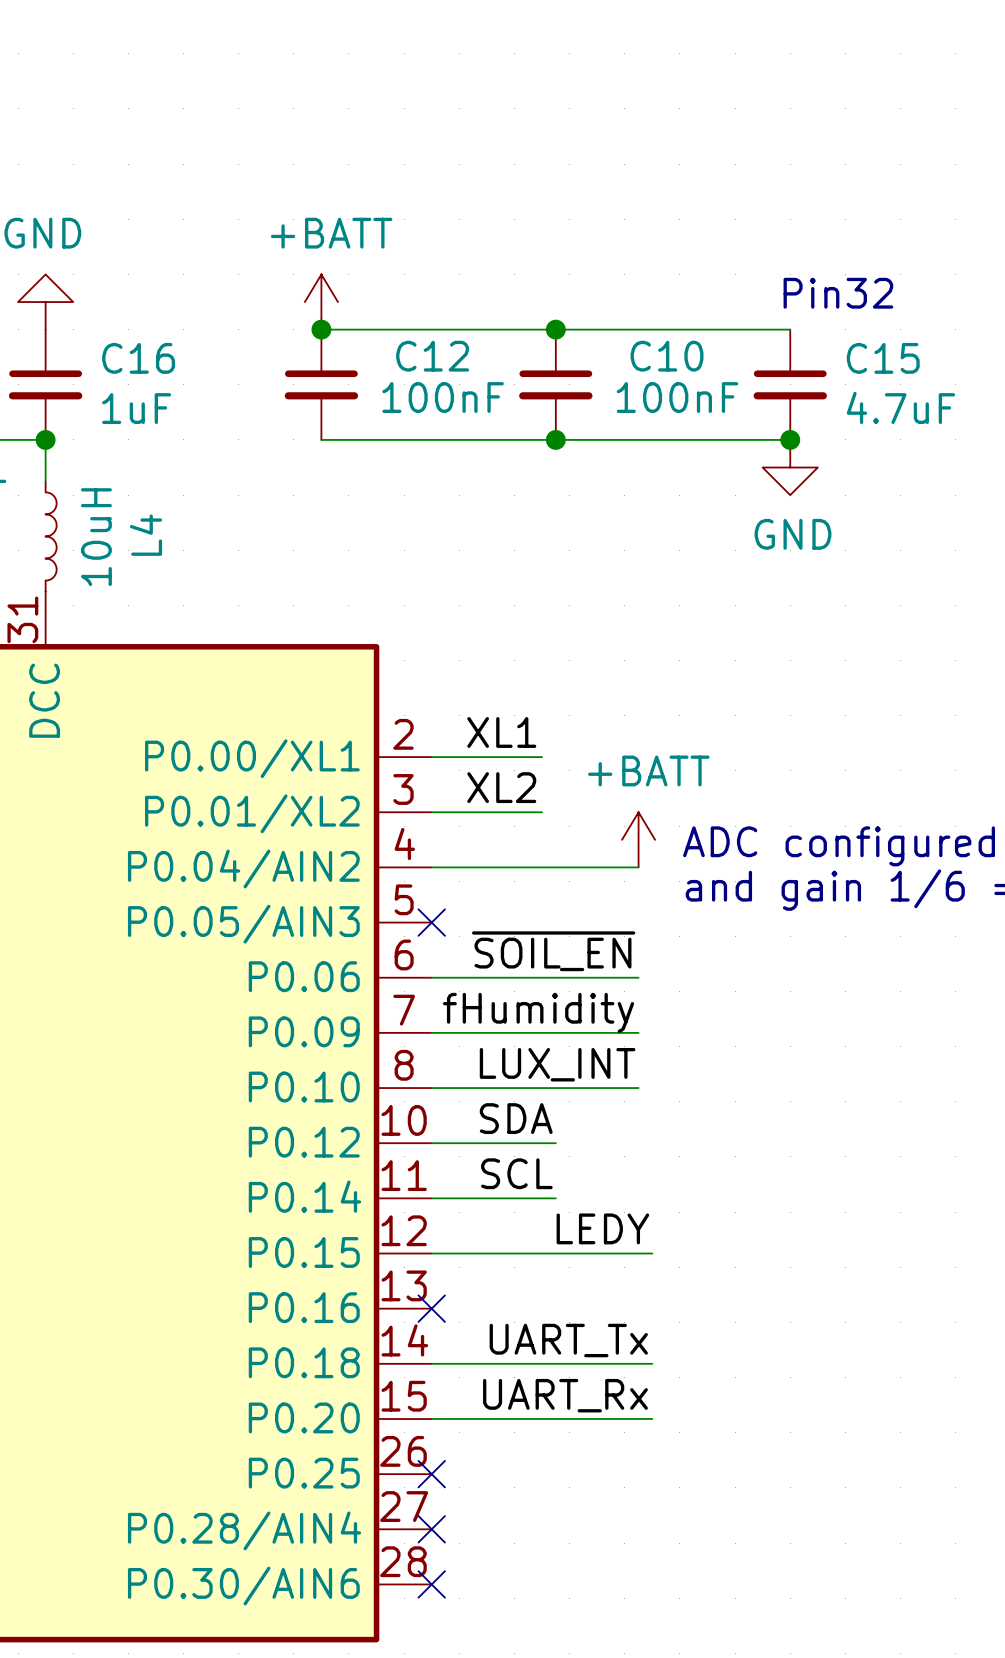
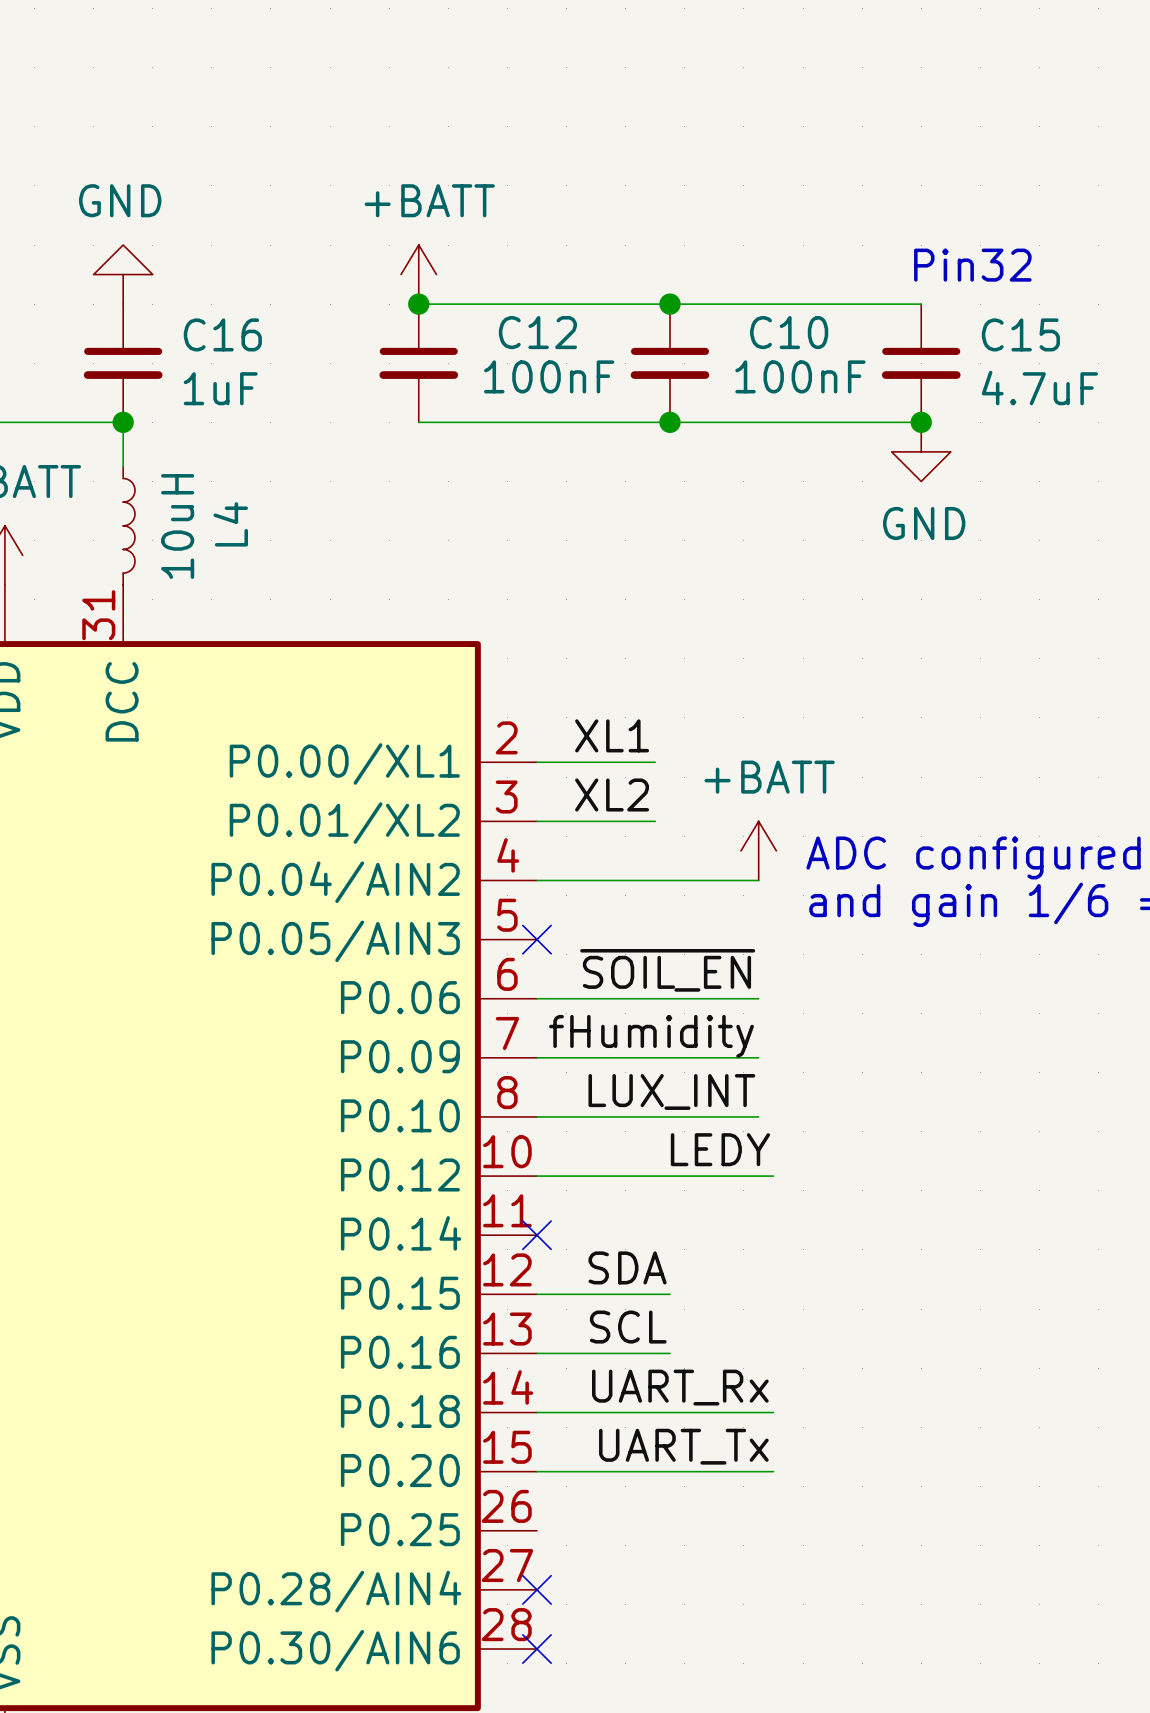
label position: SDA (516, 1118) -> SDA (627, 1267)
label position: SCL (516, 1173) -> SCL (628, 1327)
wire: (431, 1198) (555, 1198) -> (536, 1353) (670, 1353)
label position: LEDY (602, 1228) -> LEDY (720, 1149)
wire: (555, 1253) (652, 1253) -> (670, 1176) (773, 1176)
no-connect mark position: (431, 1308) -> (536, 1235)
label: UART_Tx (568, 1340) -> UART_Rx (680, 1387)
label: UART_Rx (565, 1395) -> UART_Tx (683, 1446)
no-connect mark: (431, 1474) -> none

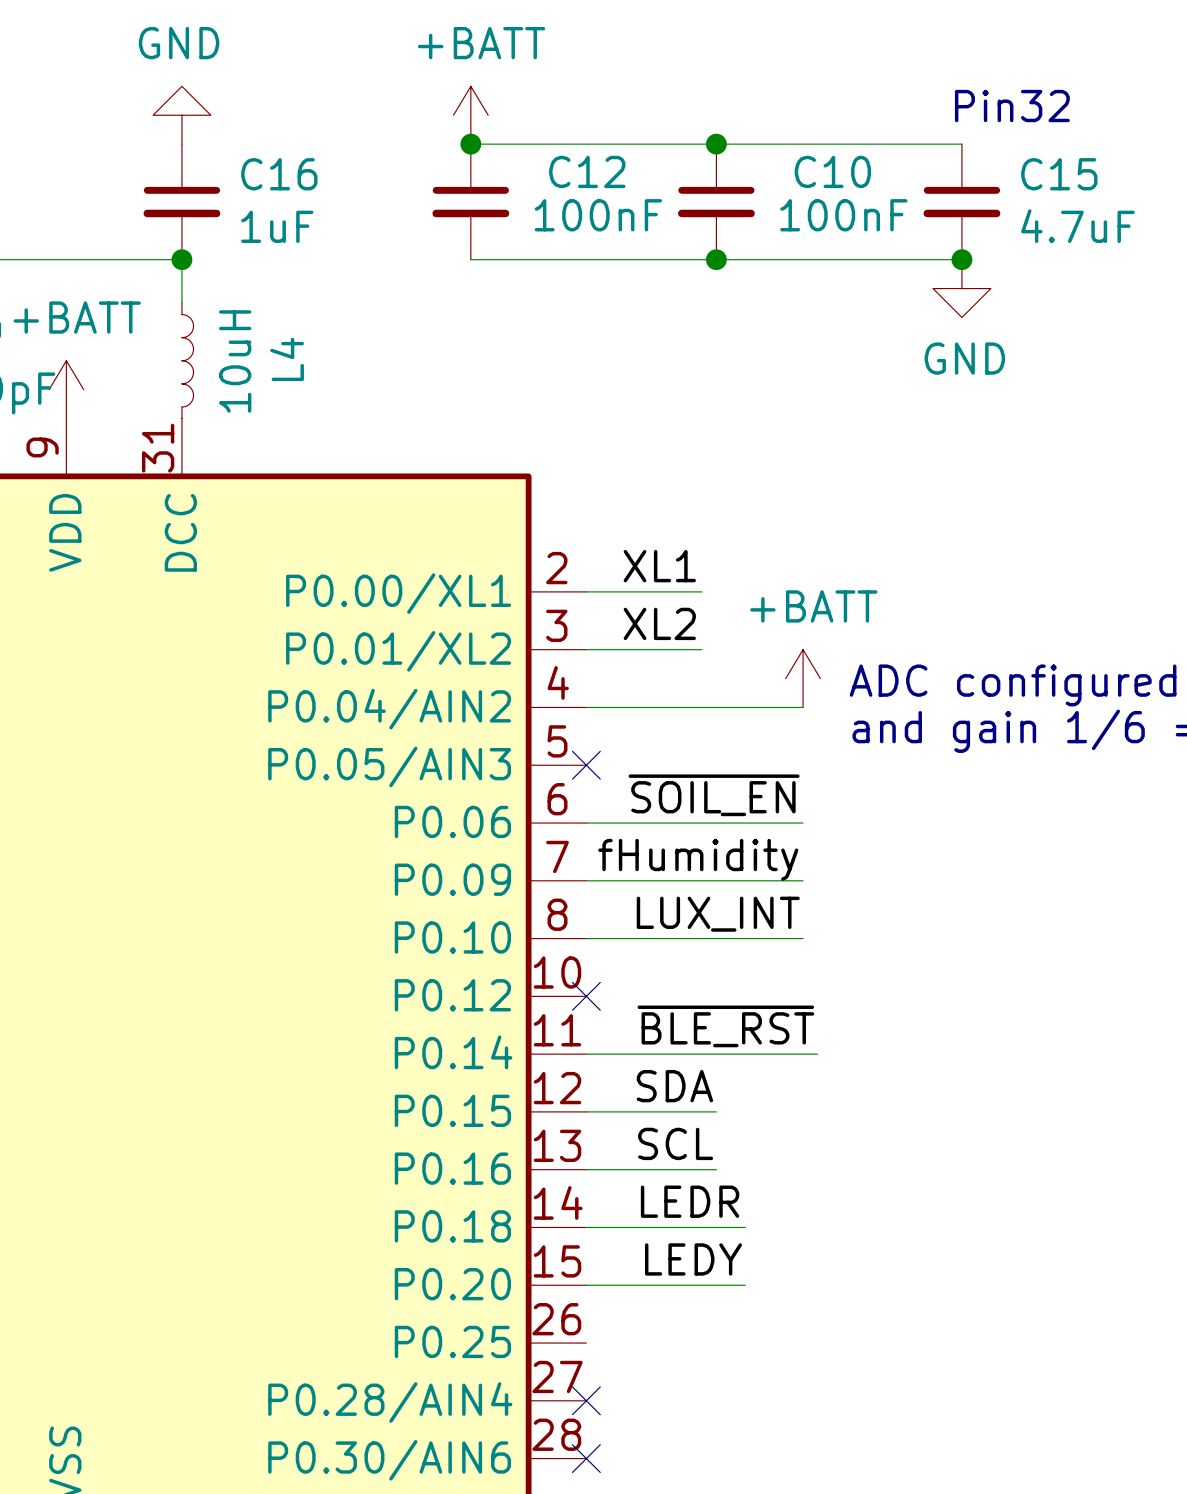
label position: LEDY (720, 1149) -> LEDY (693, 1259)
wire: (536, 1176) (773, 1176) -> (586, 1054) (817, 1054)
label: none -> ~{BLE_RST} (725, 1026)
no-connect mark position: (536, 1235) -> (586, 996)
label: none -> LEDR (690, 1201)
label: UART_Rx (680, 1387) -> none
wire: (699, 1412) (773, 1412) -> none
label: UART_Tx (683, 1446) -> none
wire: (699, 1471) (773, 1471) -> none

